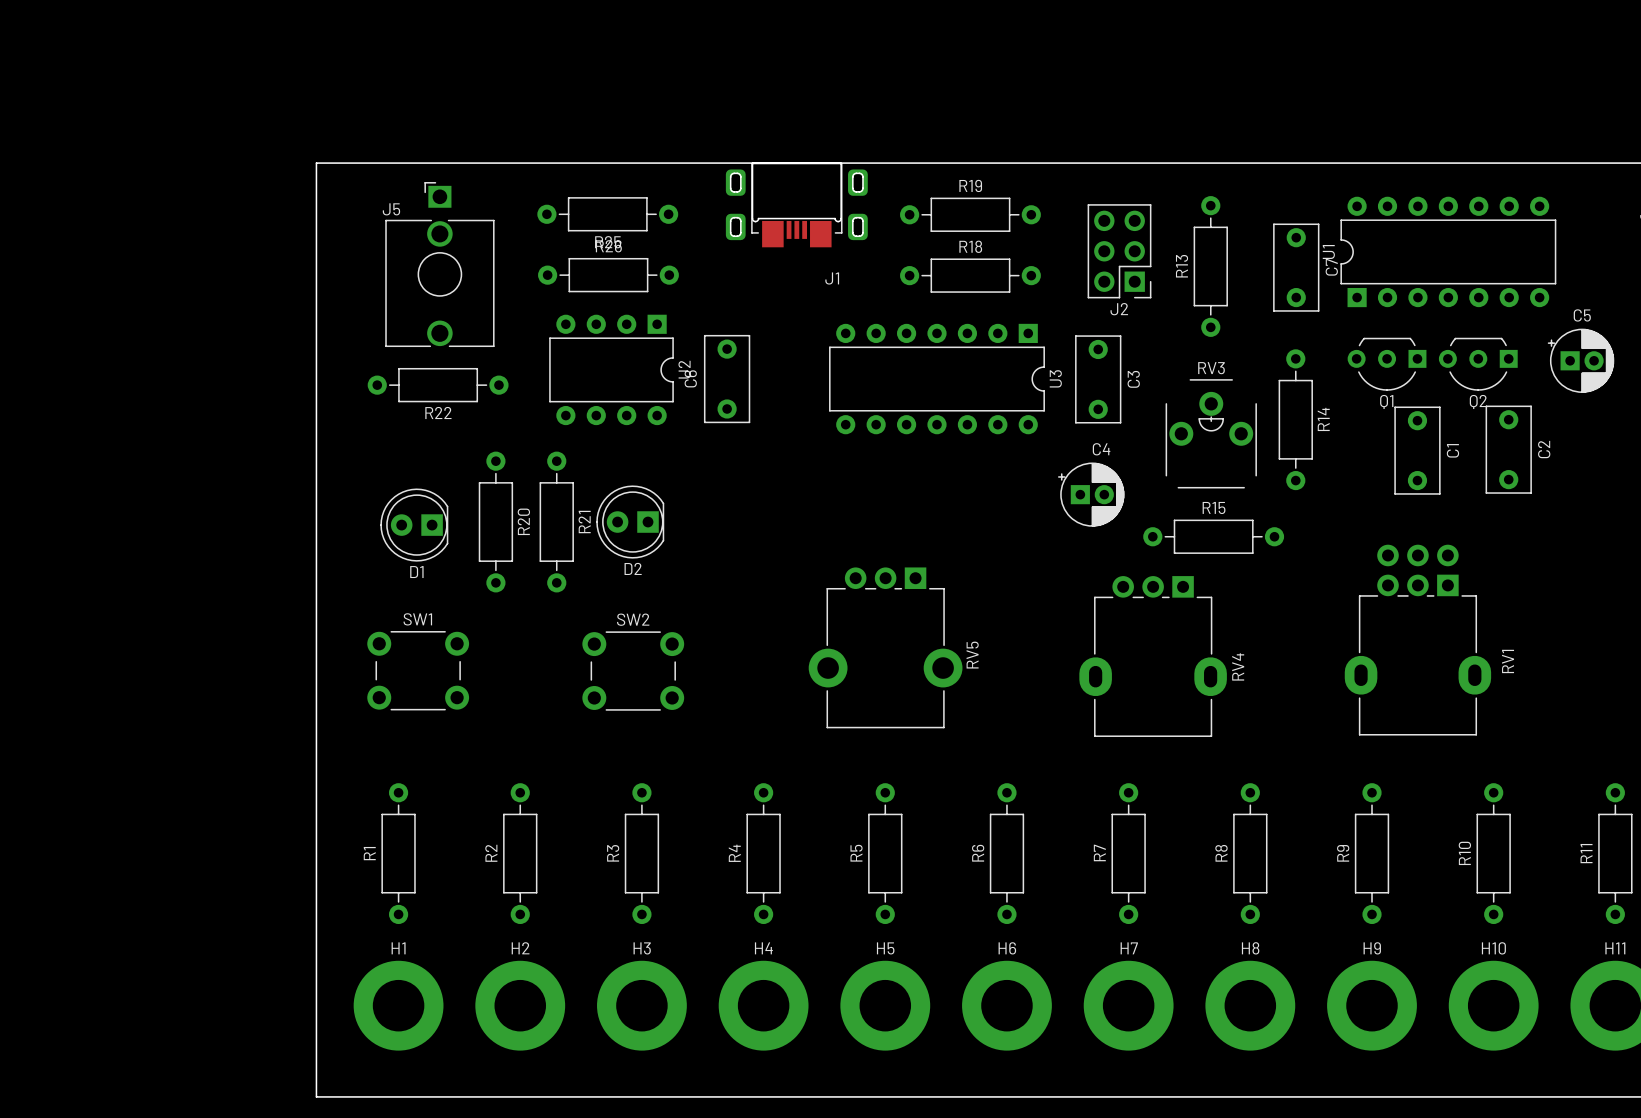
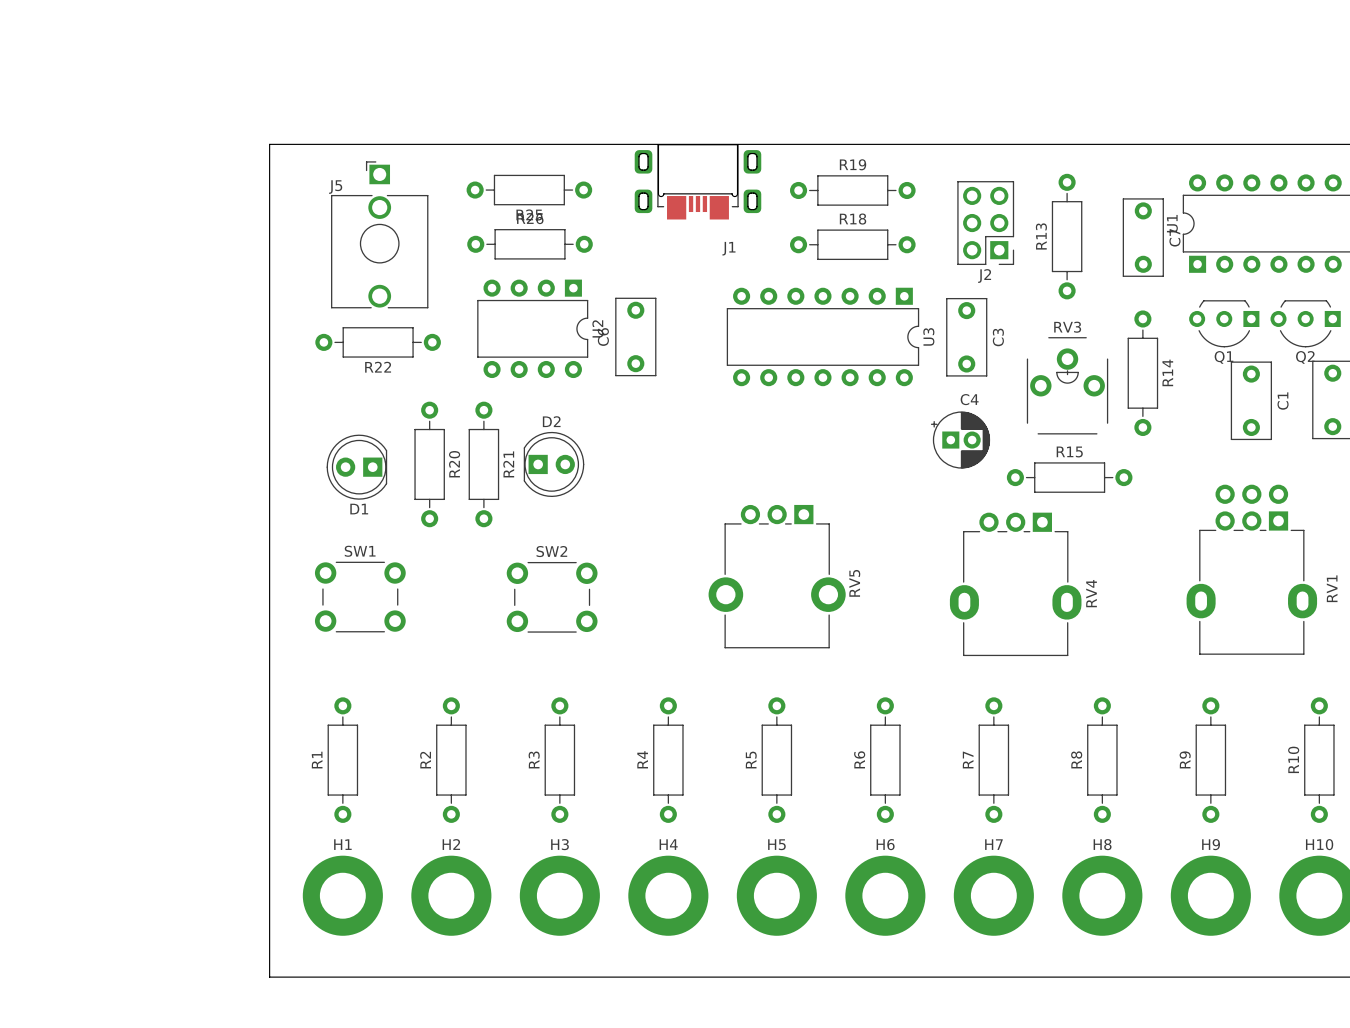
D2 rotation: 0° (630, 522) -> 180° (554, 464)

